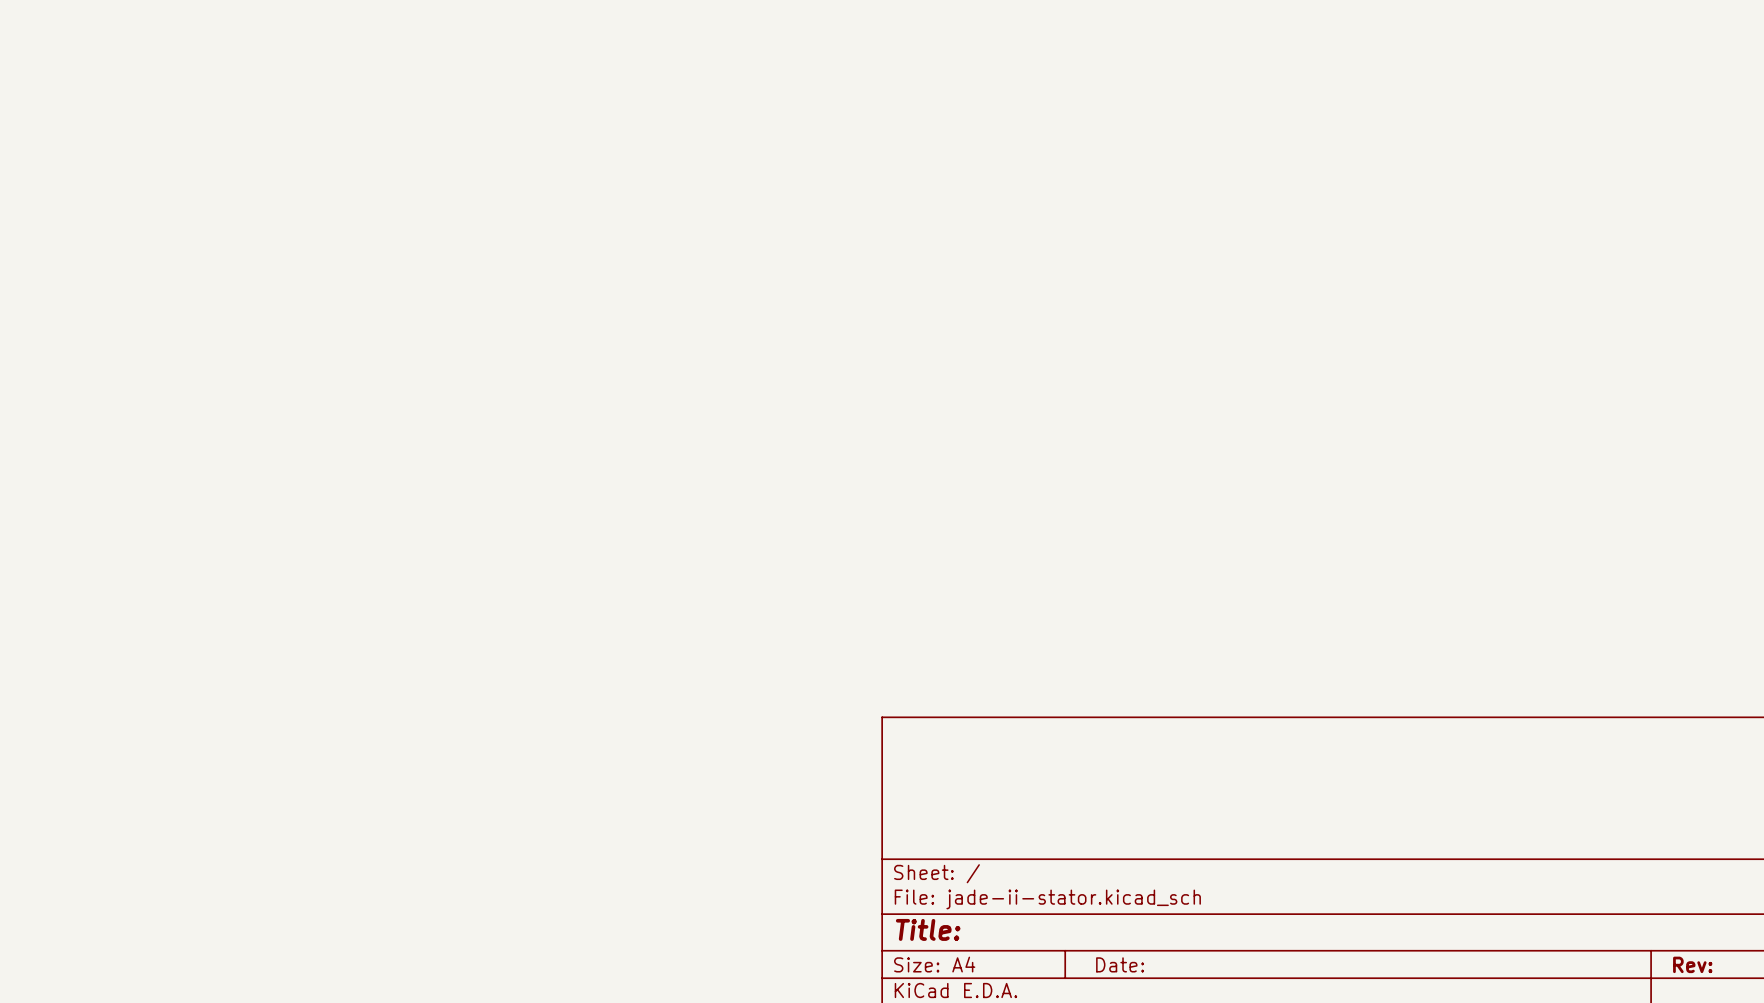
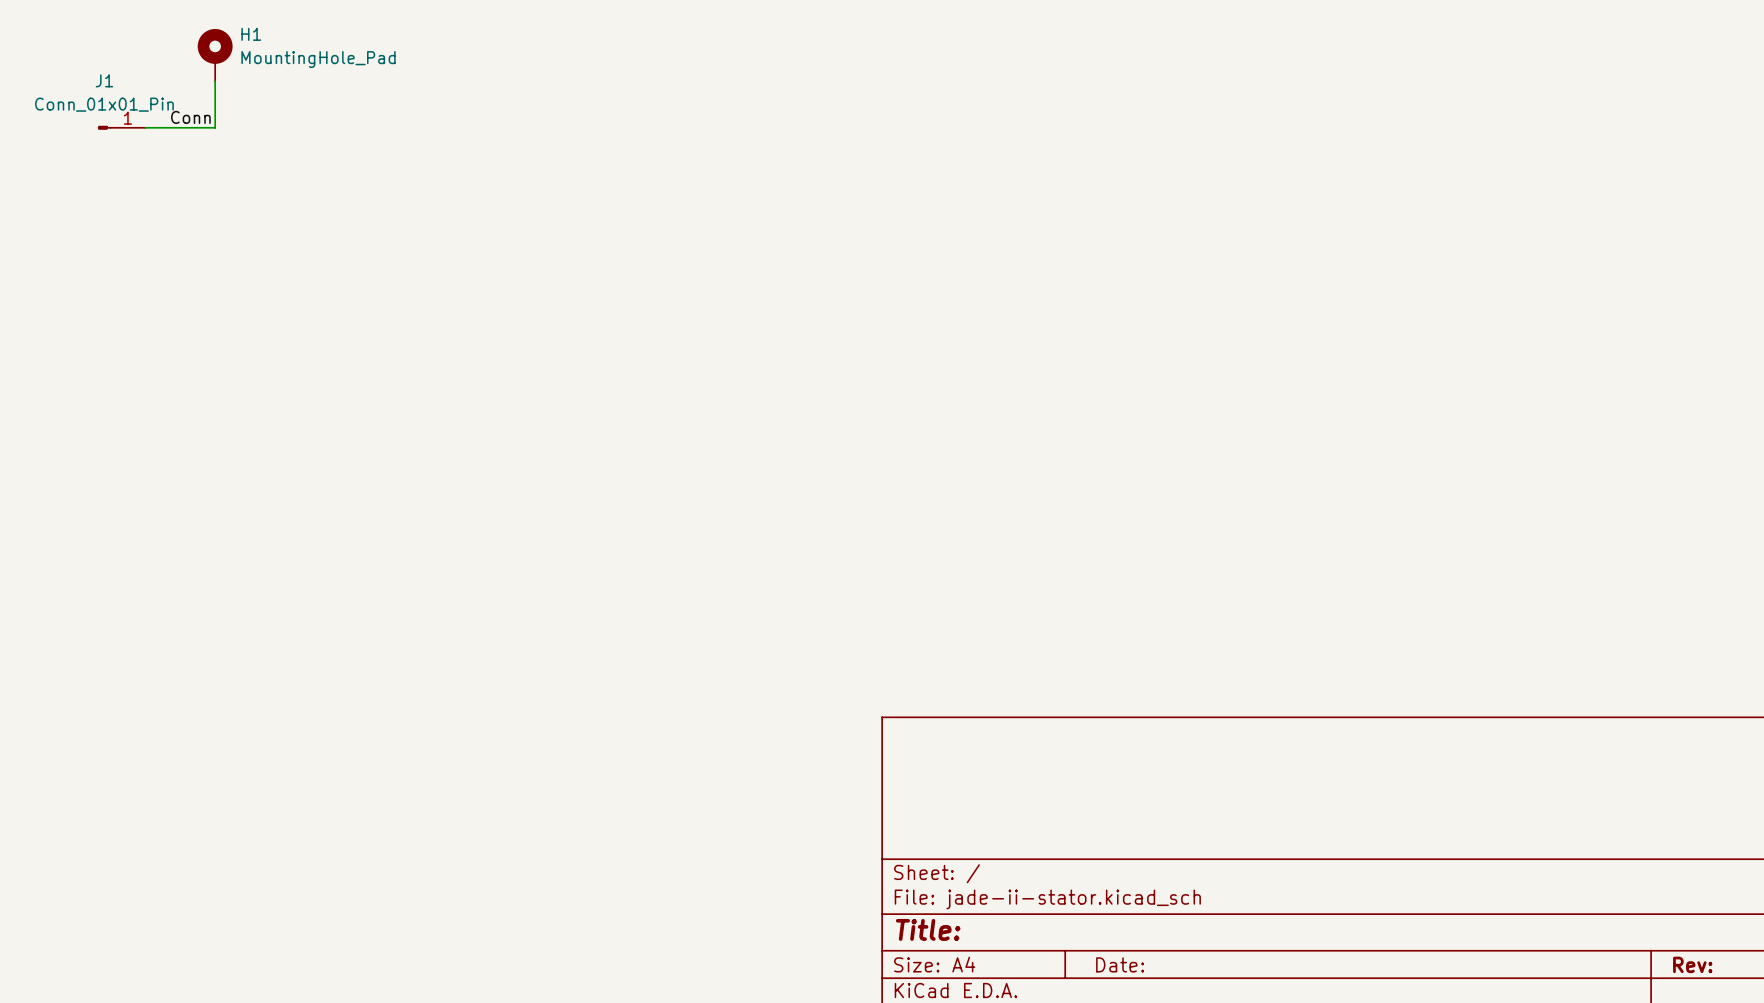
H1: none -> MountingHole_Pad (215, 55)
wire: none -> (215, 81) (215, 127) (145, 127)
label: none -> Conn (190, 117)
J1: none -> Conn_01x01_Pin (121, 127)

